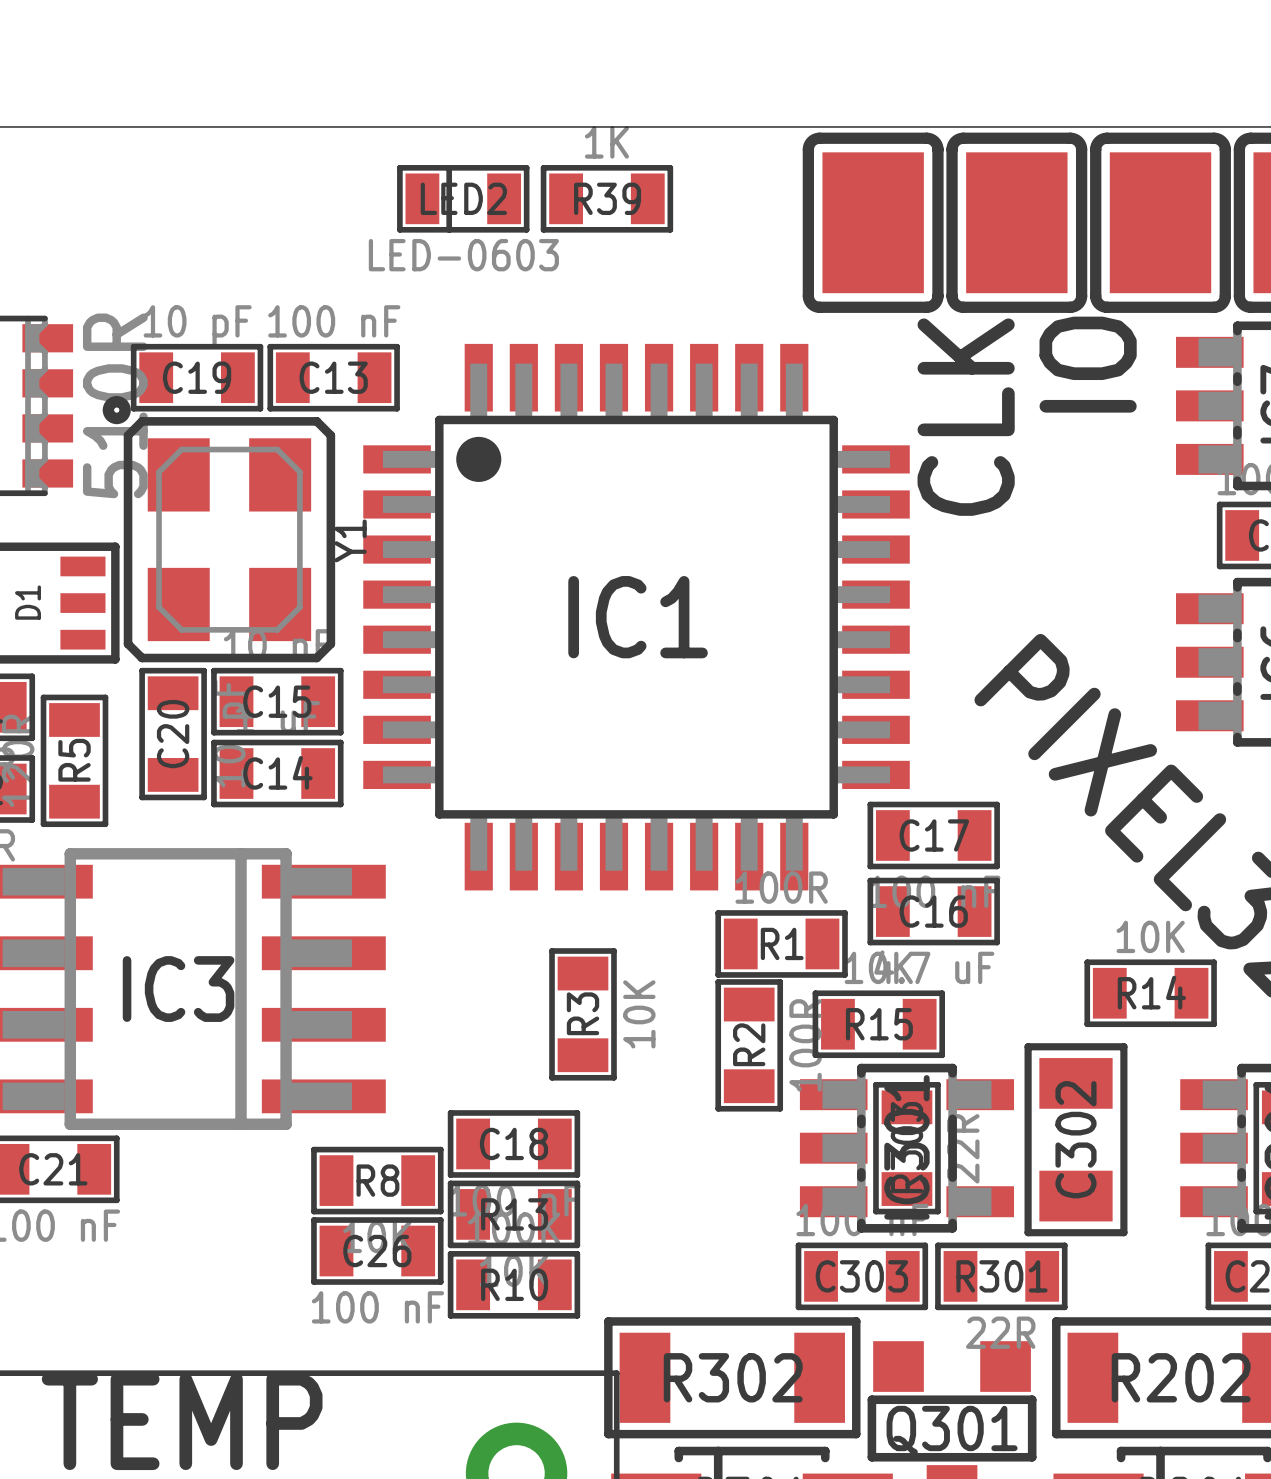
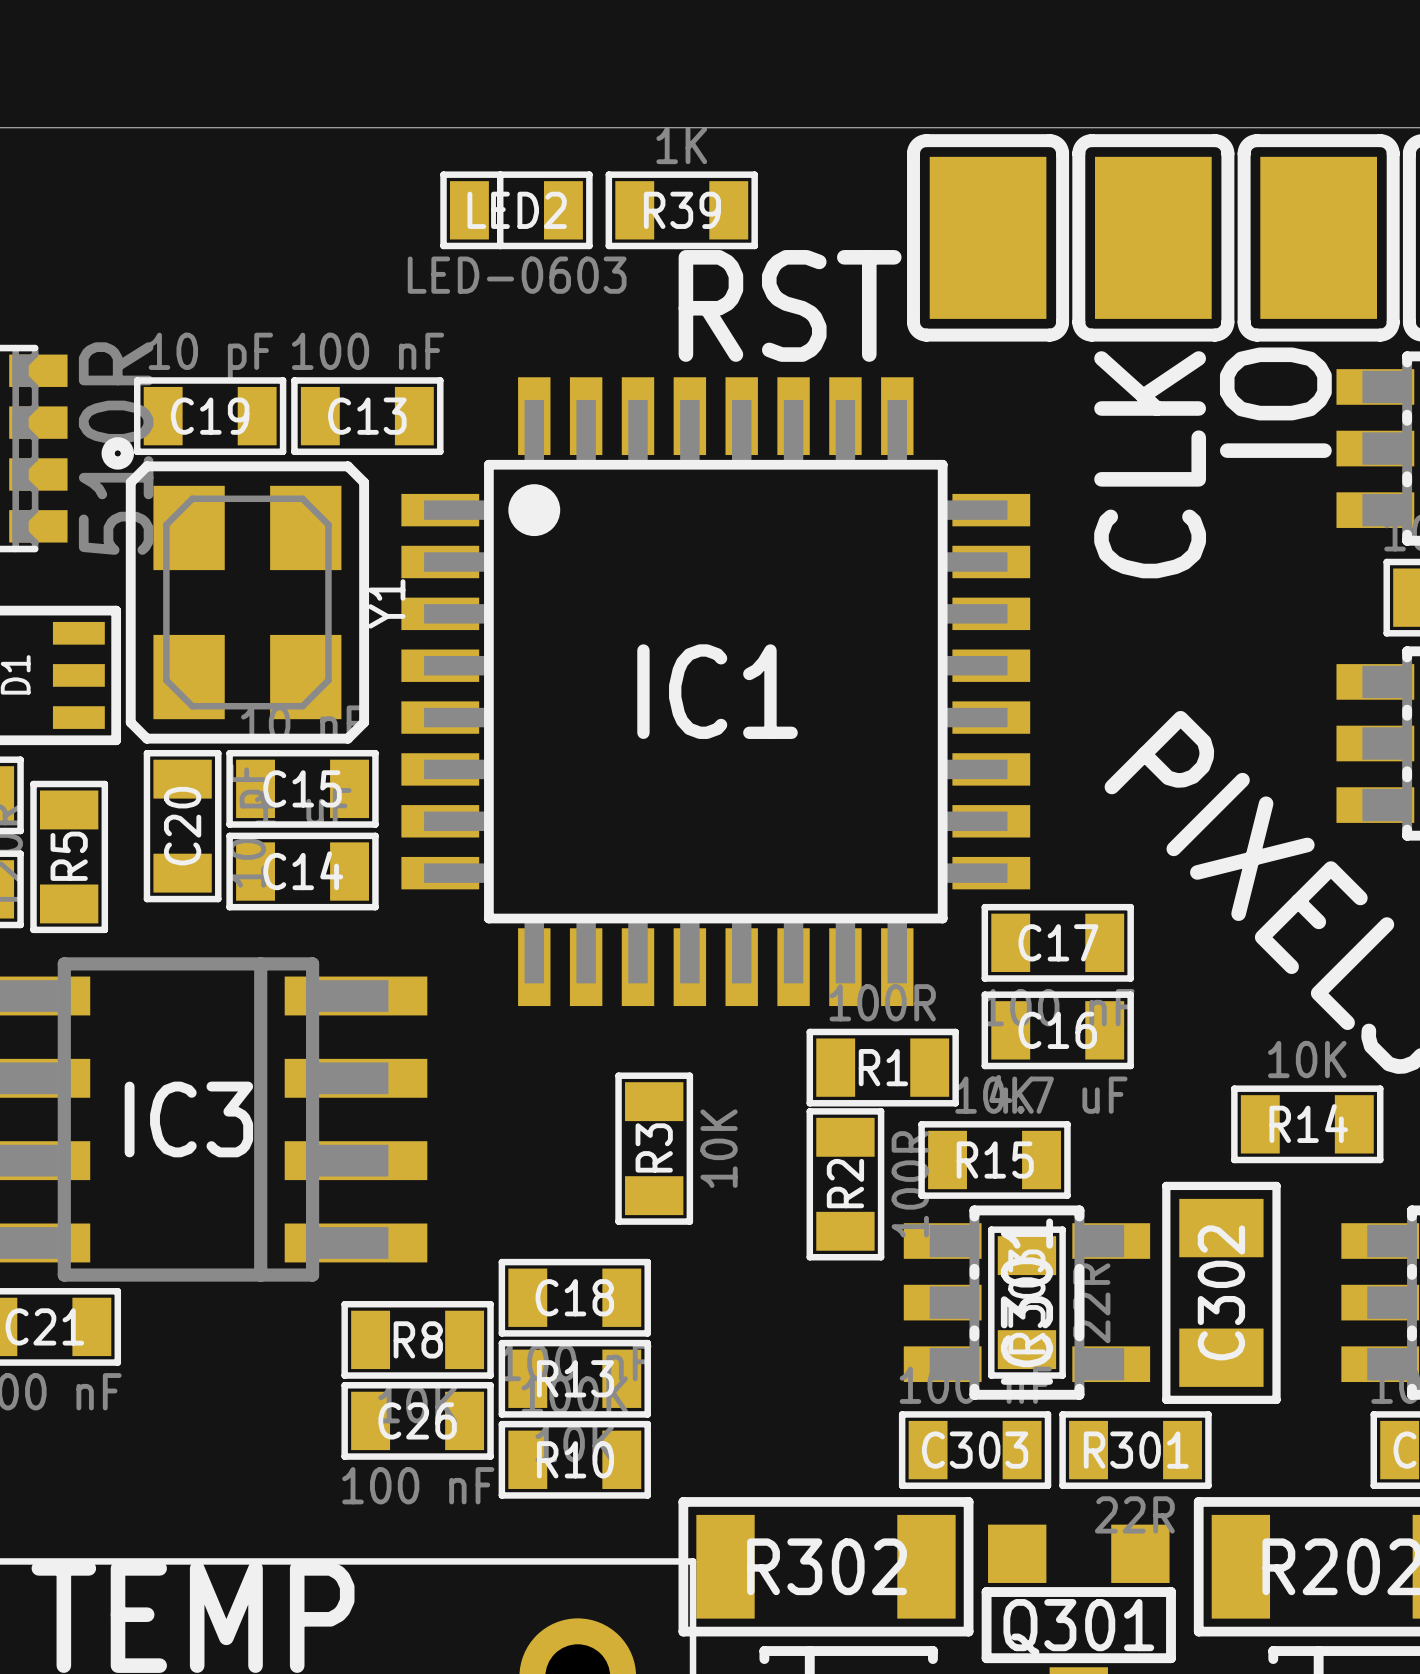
text: none -> RST (790, 305)
text position: IO (1088, 364) -> IO (1275, 402)
text position: CLK (966, 417) -> CLK (1150, 464)

